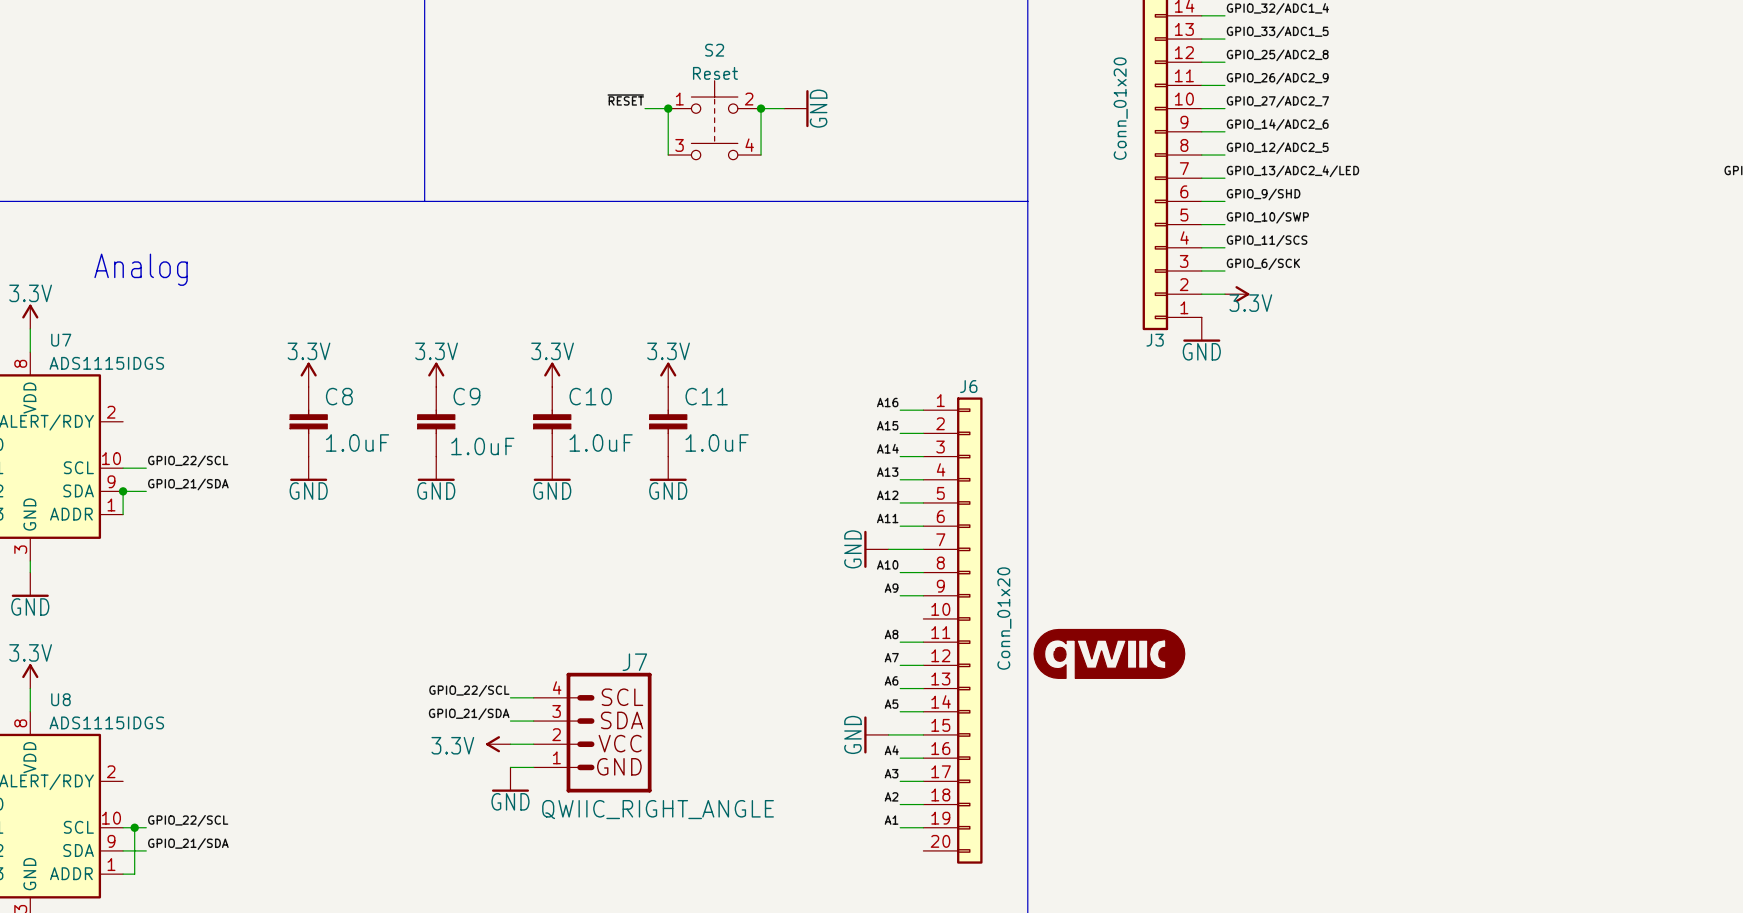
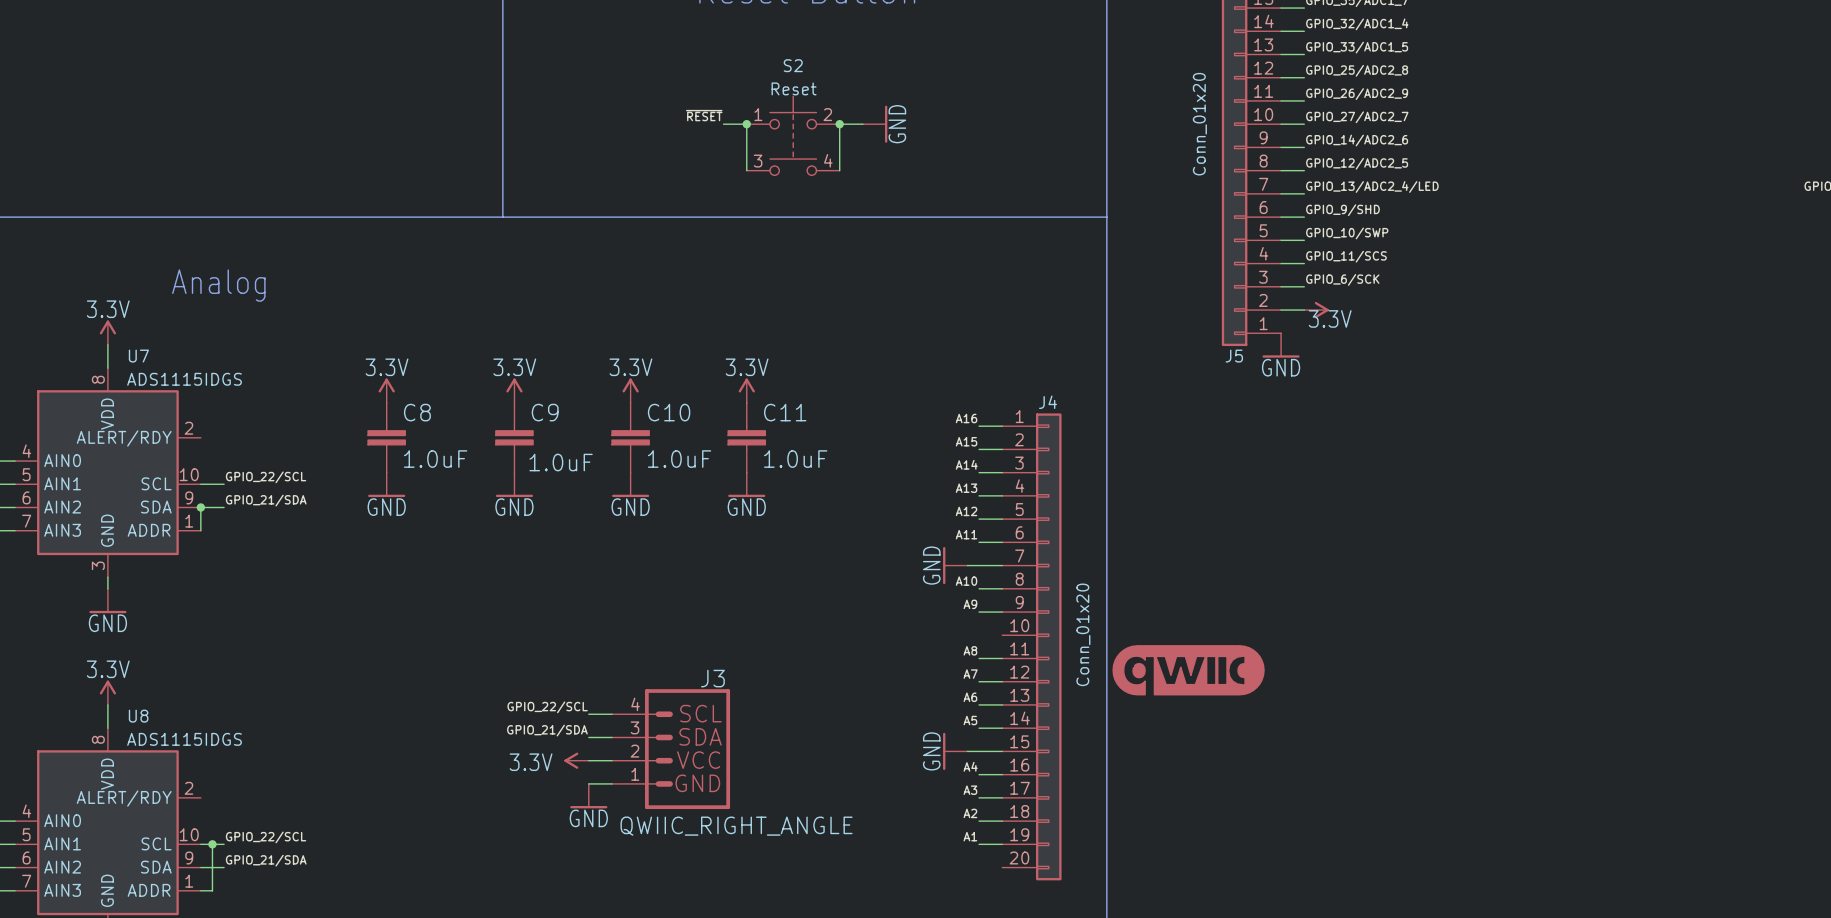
J3 name: J3 (1155, 340) -> J5 (1234, 356)
J6 name: J6 (968, 386) -> J4 (1048, 402)
J7 name: J7 (634, 662) -> J3 (712, 678)

